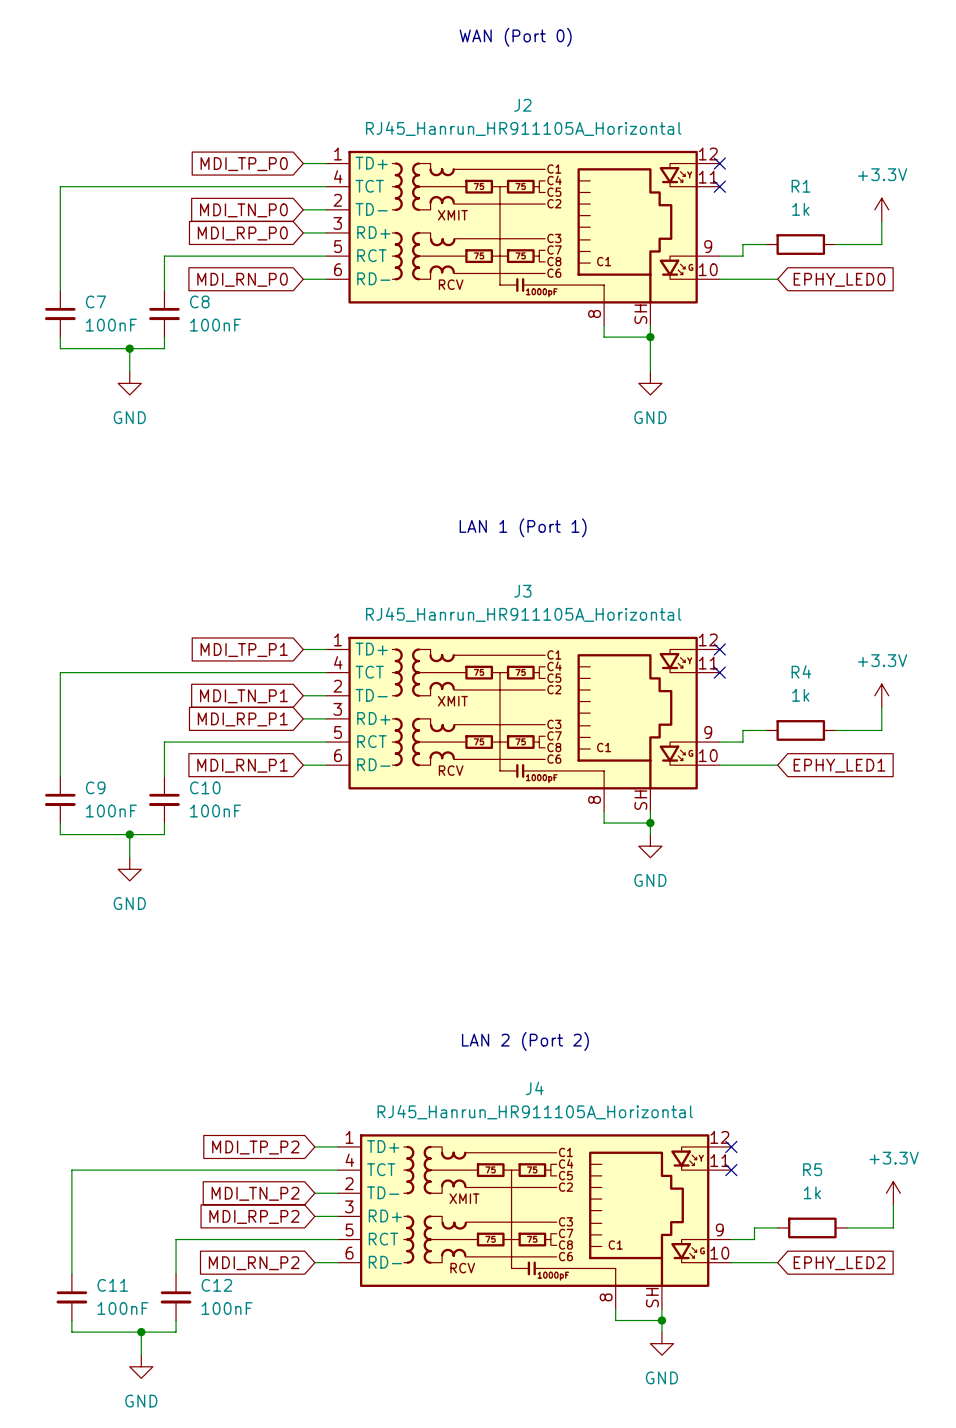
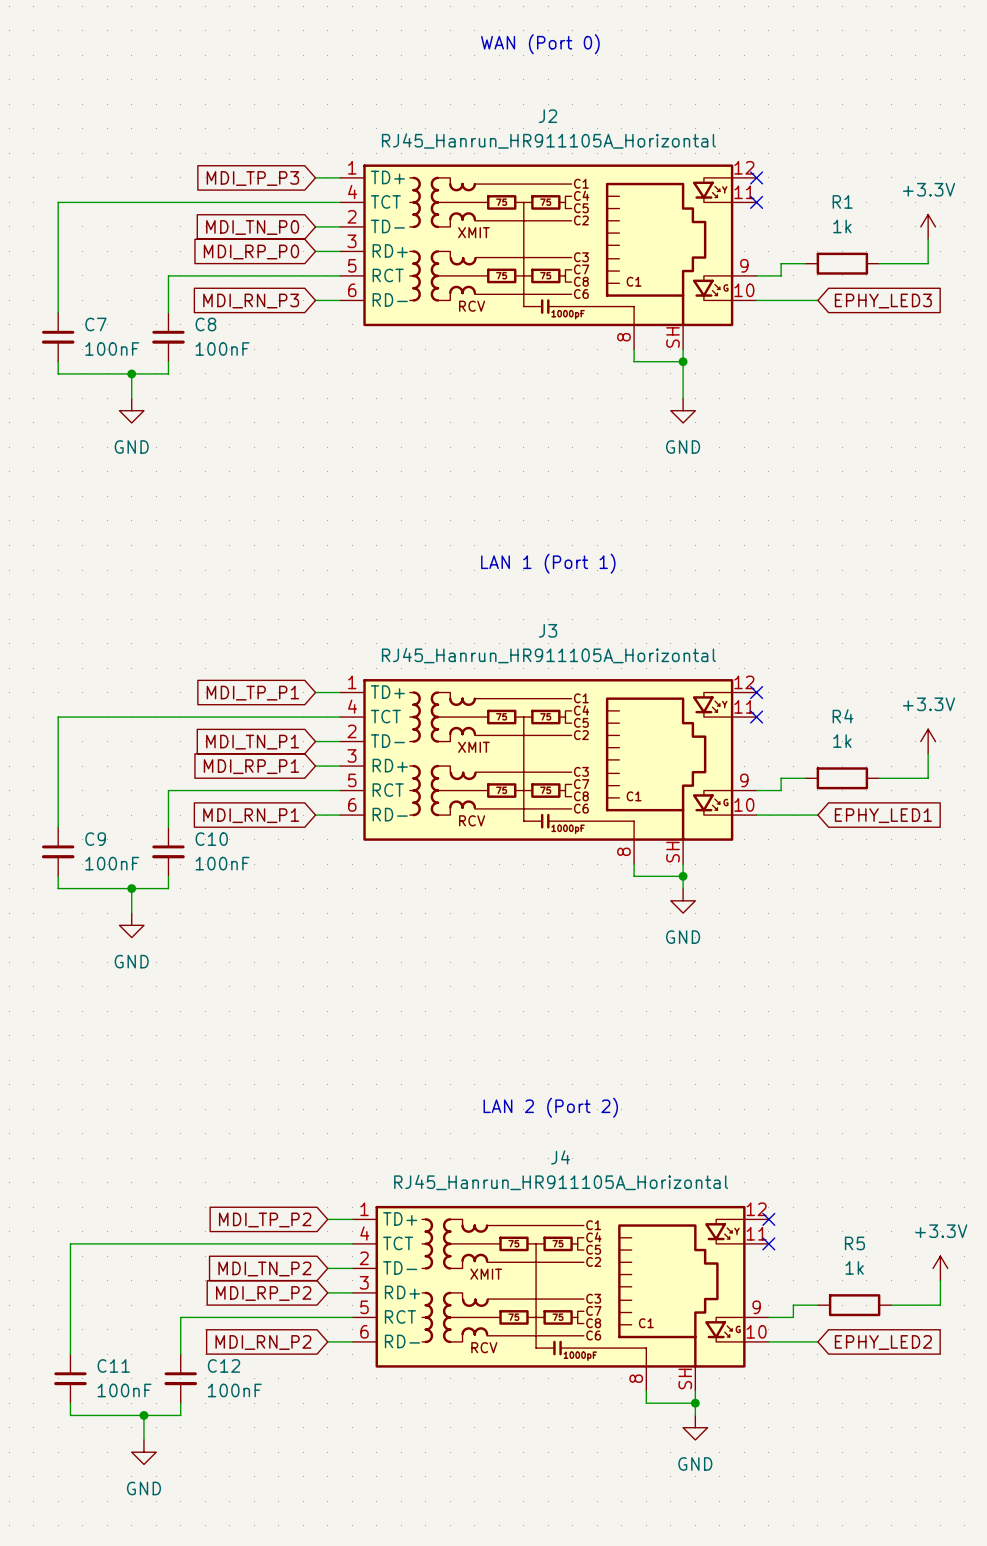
global label: MDI_TP_P0 (244, 164) -> MDI_TP_P3 (252, 178)
global label: MDI_RN_P0 (242, 279) -> MDI_RN_P3 (251, 301)
global label: EPHY_LED0 (839, 279) -> EPHY_LED3 (883, 301)

